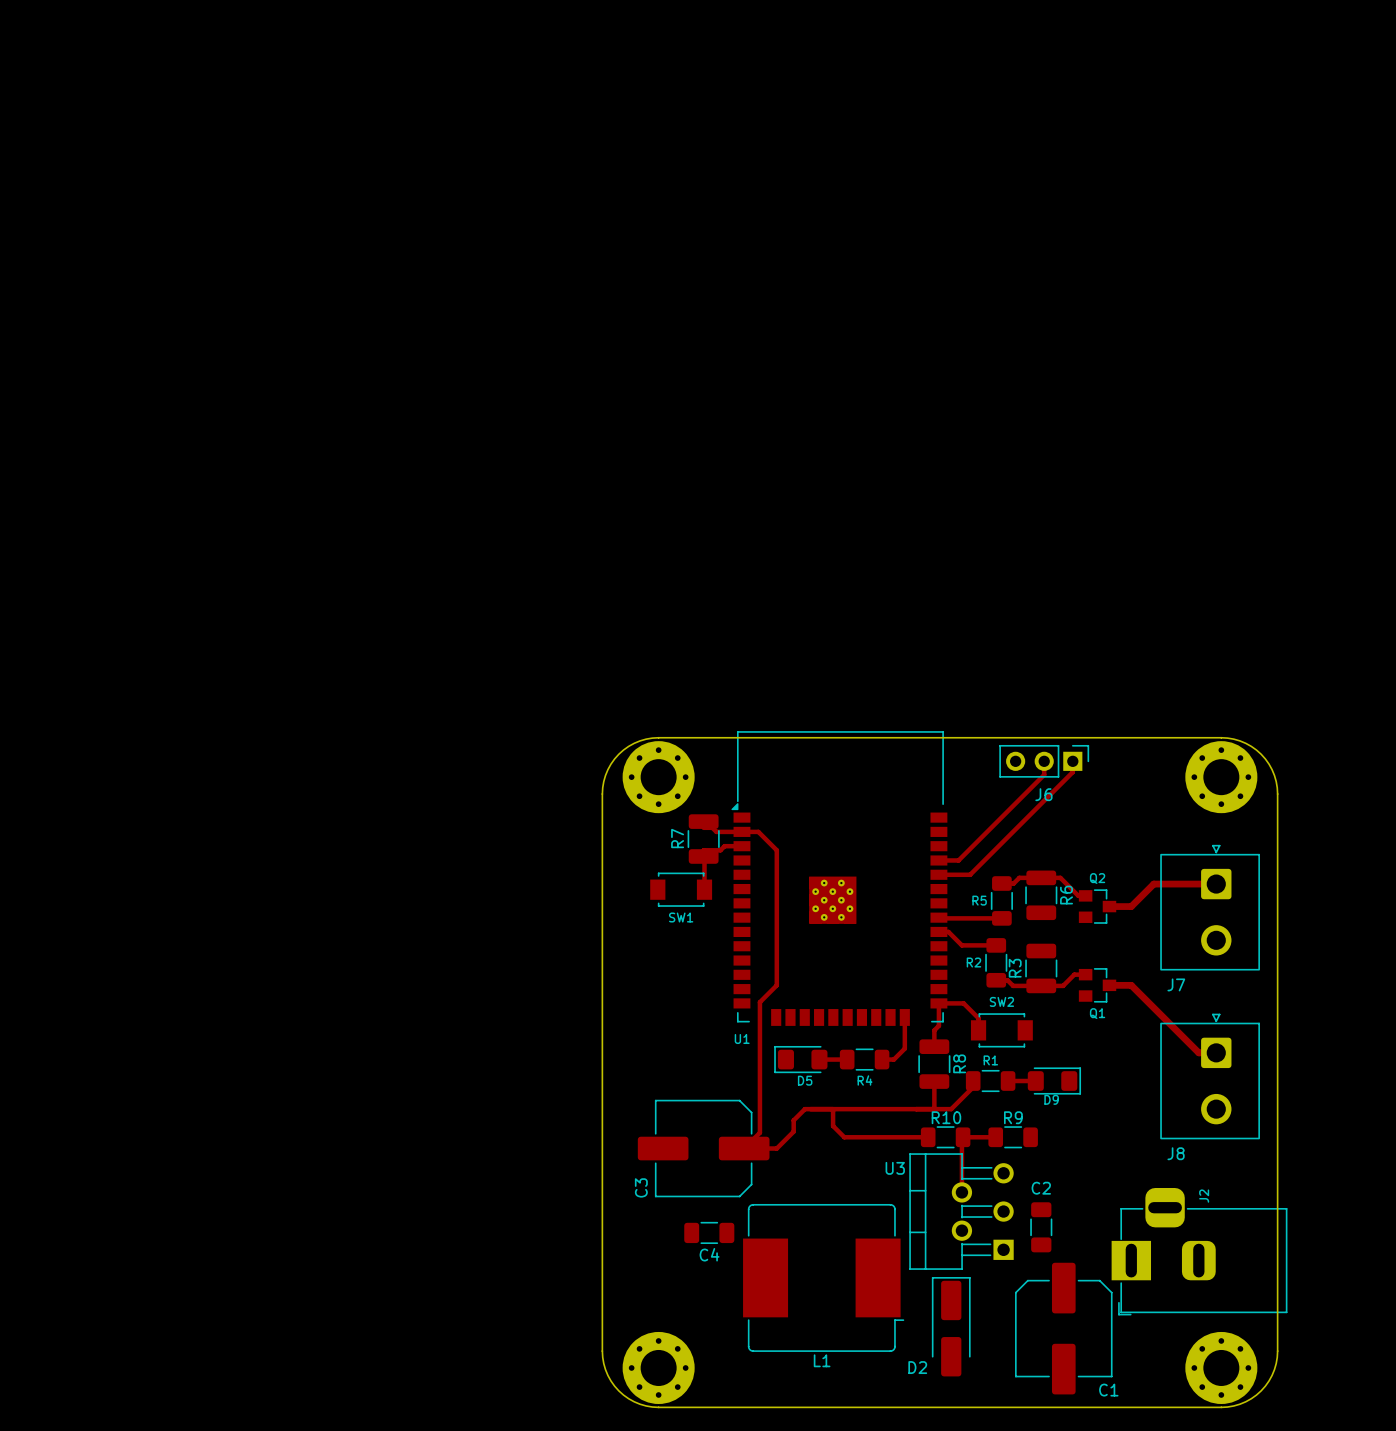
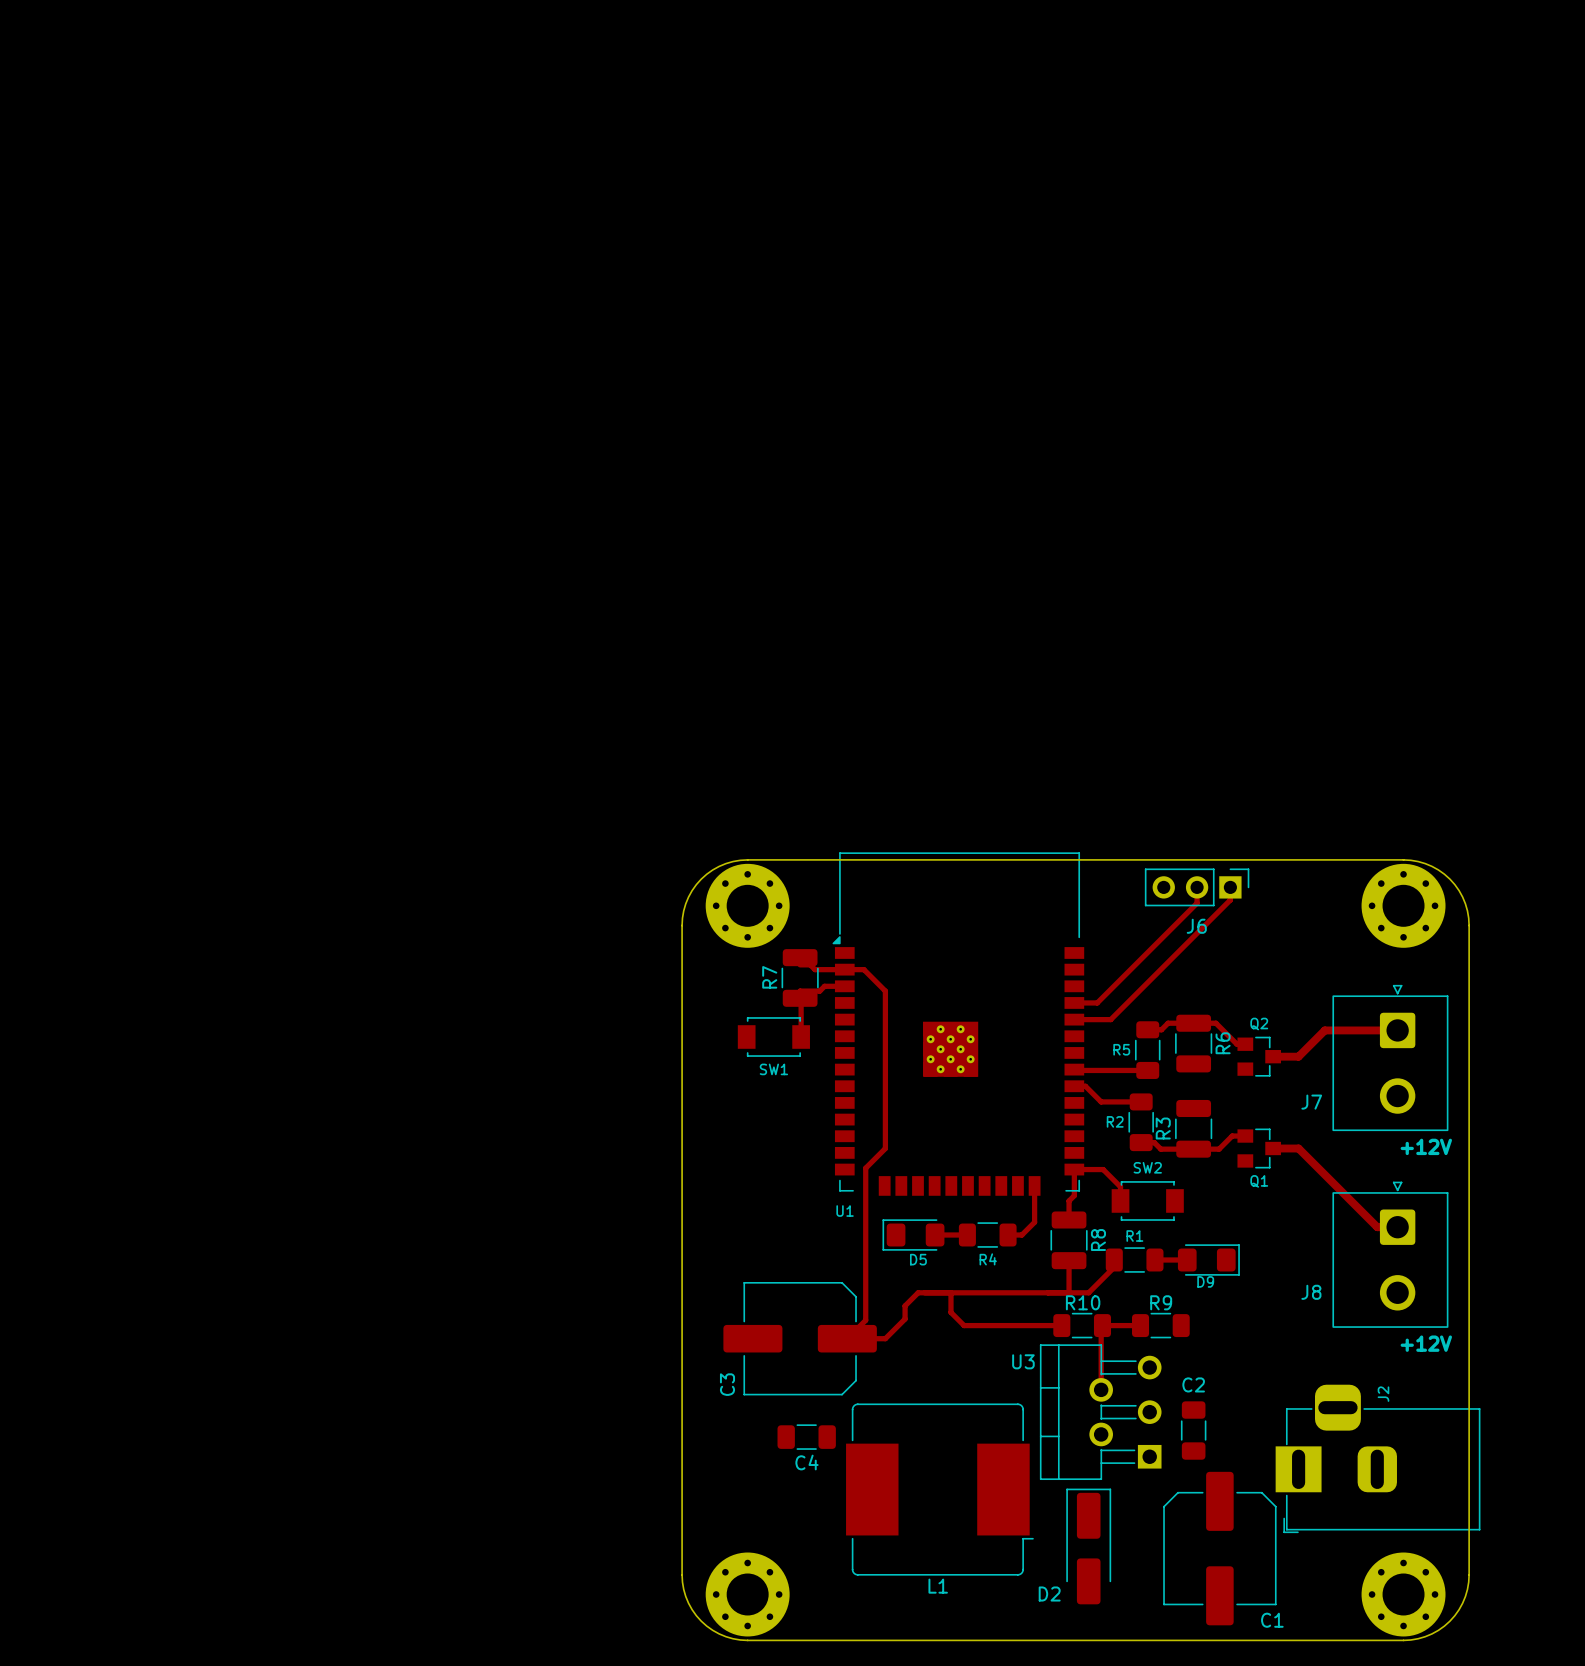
text: none -> +12V (1426, 1146)
J7 name position: J7 (1176, 984) -> J7 (1311, 1102)
text: none -> +12V (1426, 1343)
J8 name position: J8 (1176, 1153) -> J8 (1311, 1292)

